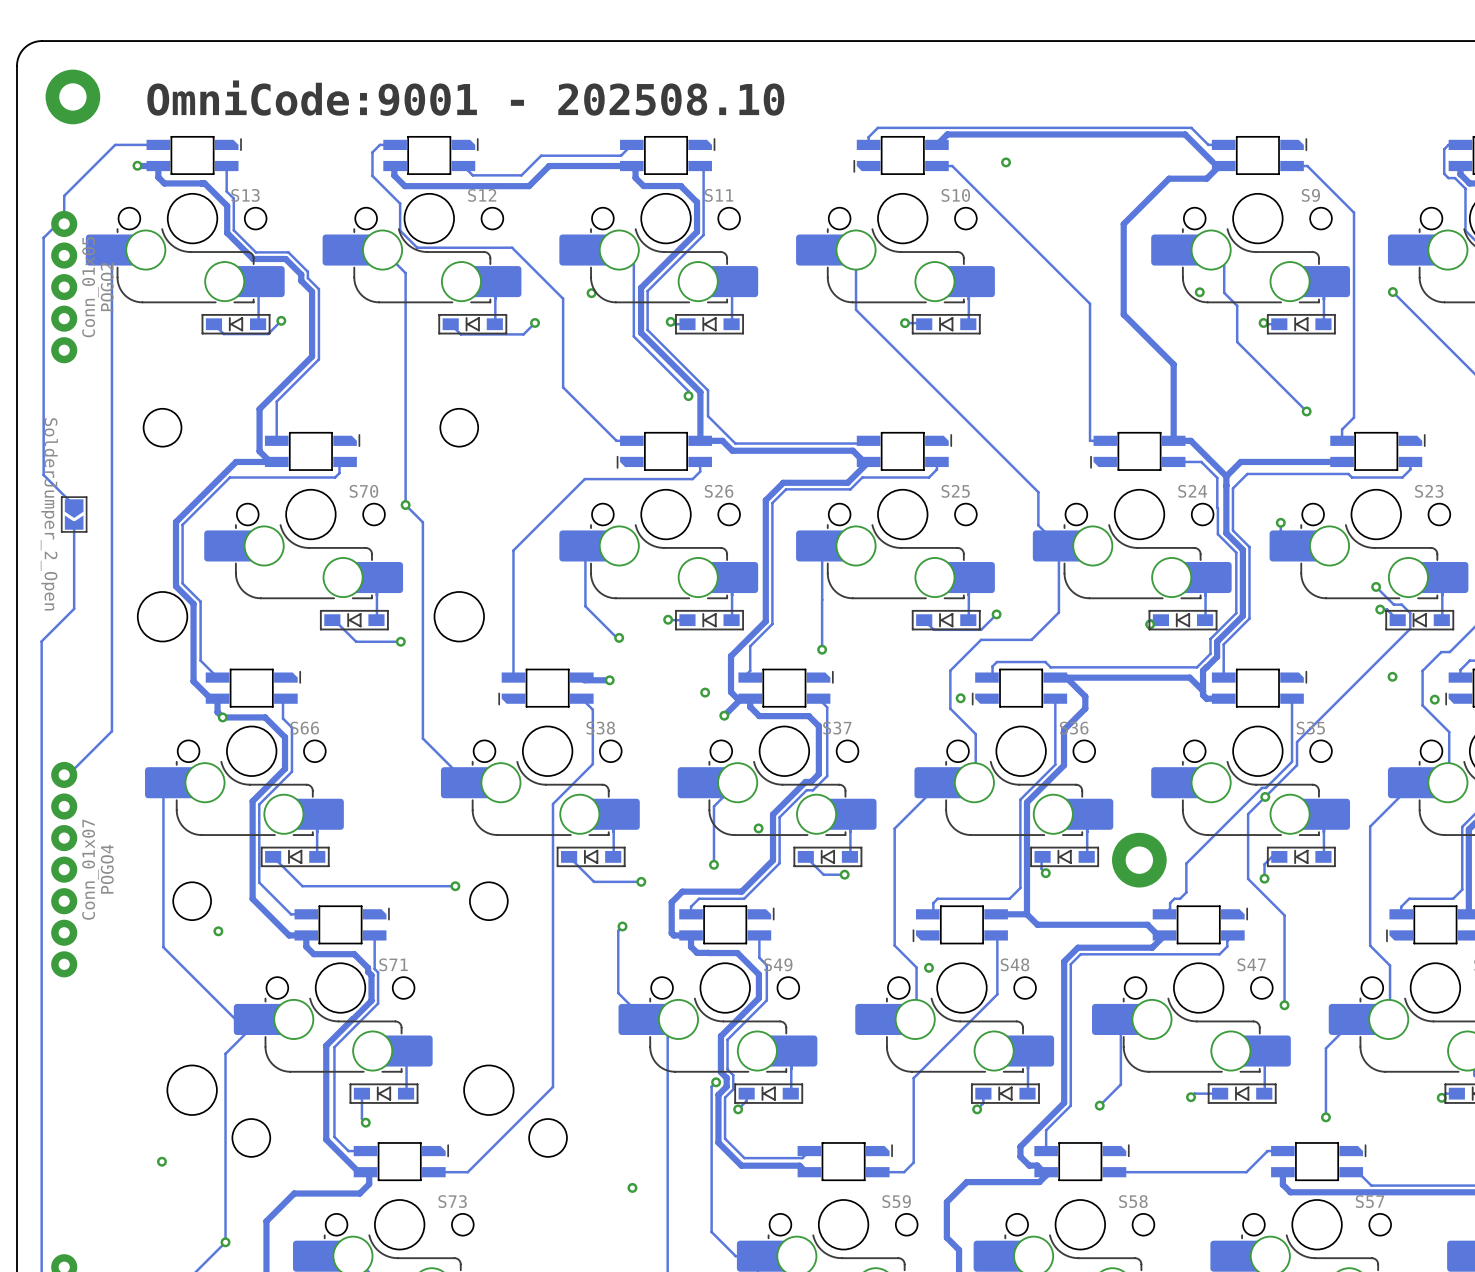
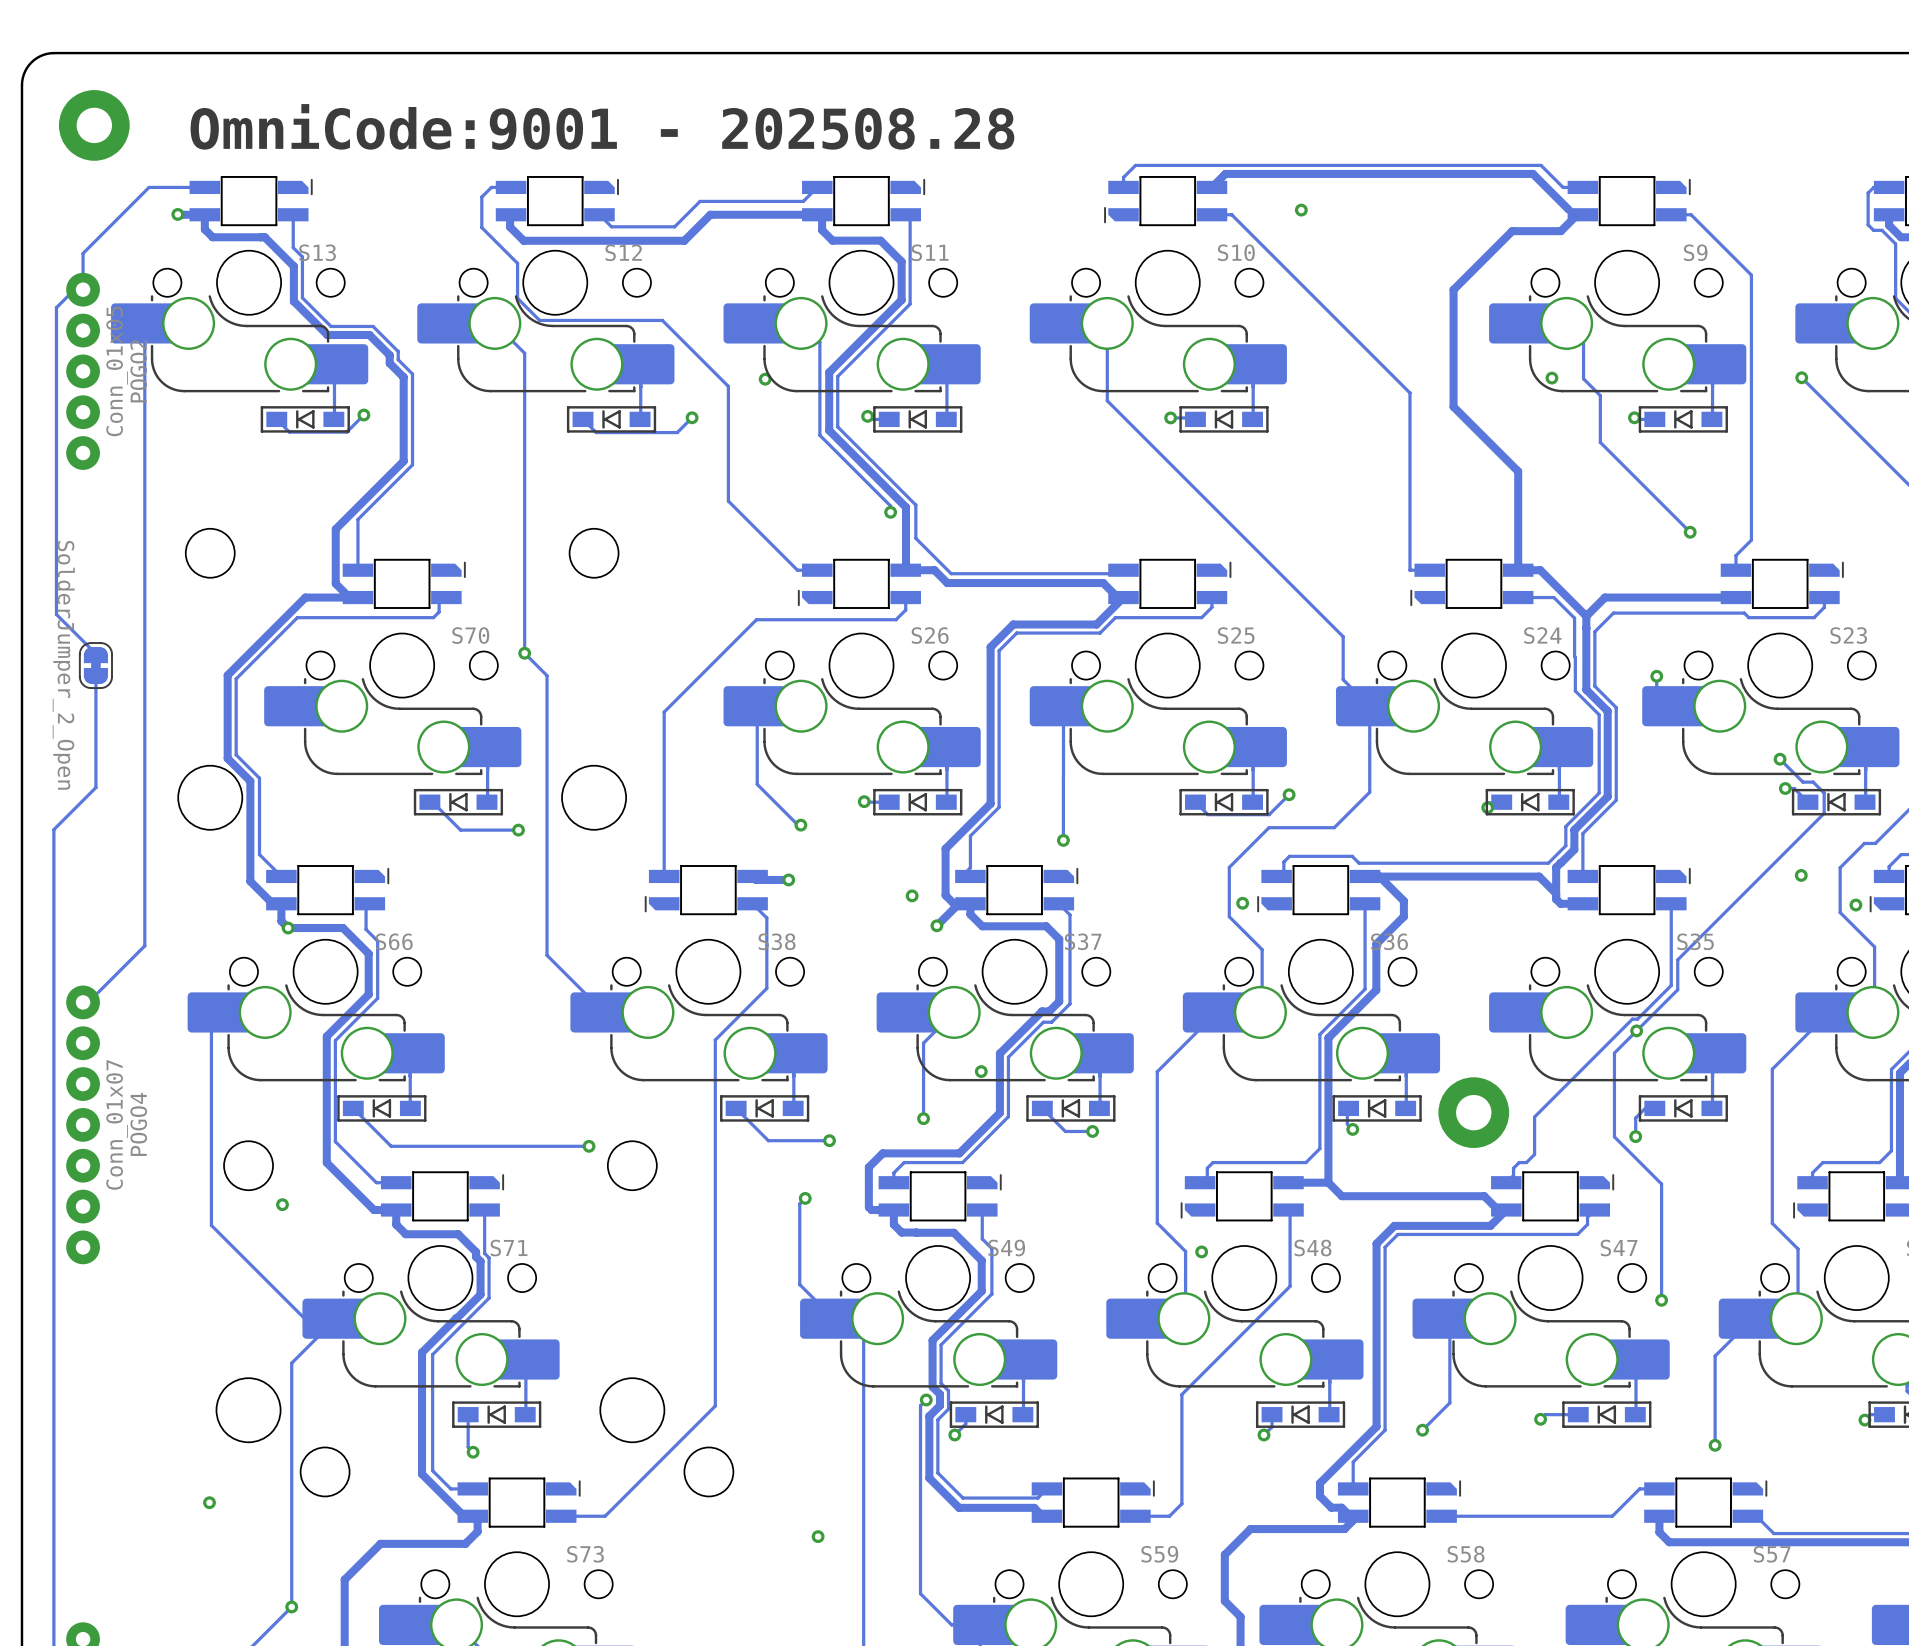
text: OmniCode:9001 - 202508.10 (465, 98) -> OmniCode:9001 - 202508.28 (602, 126)
part footprint: [60, 496, 88, 533] -> [78, 642, 113, 690]

